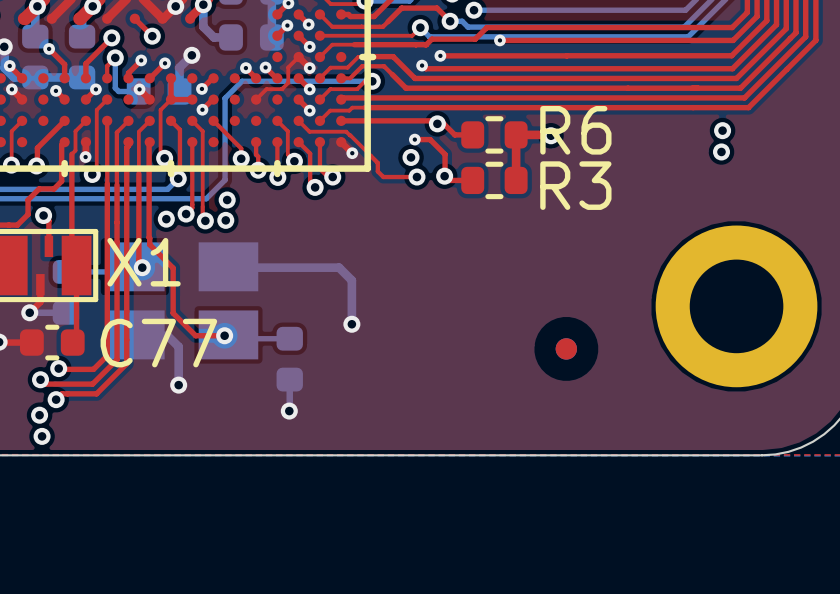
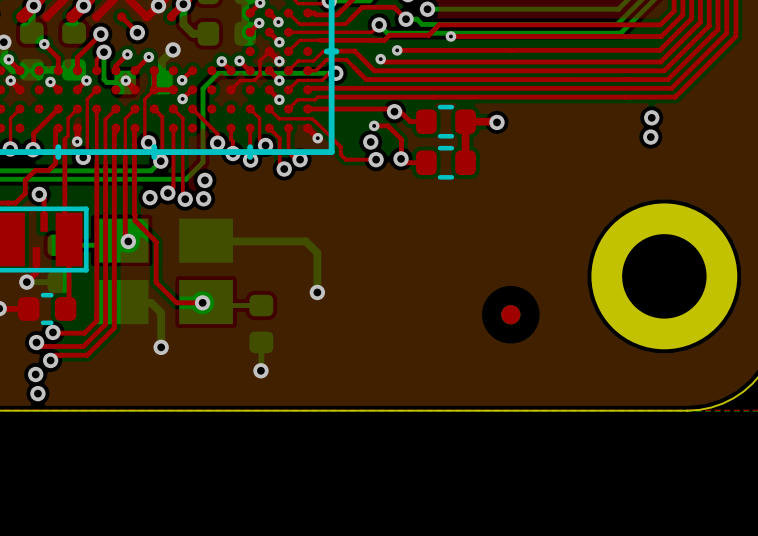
R6 name: R6 (575, 130) -> none
R3 name: R3 (575, 185) -> none
X1 name: X1 (144, 262) -> none
C77 name: C77 (158, 343) -> none

